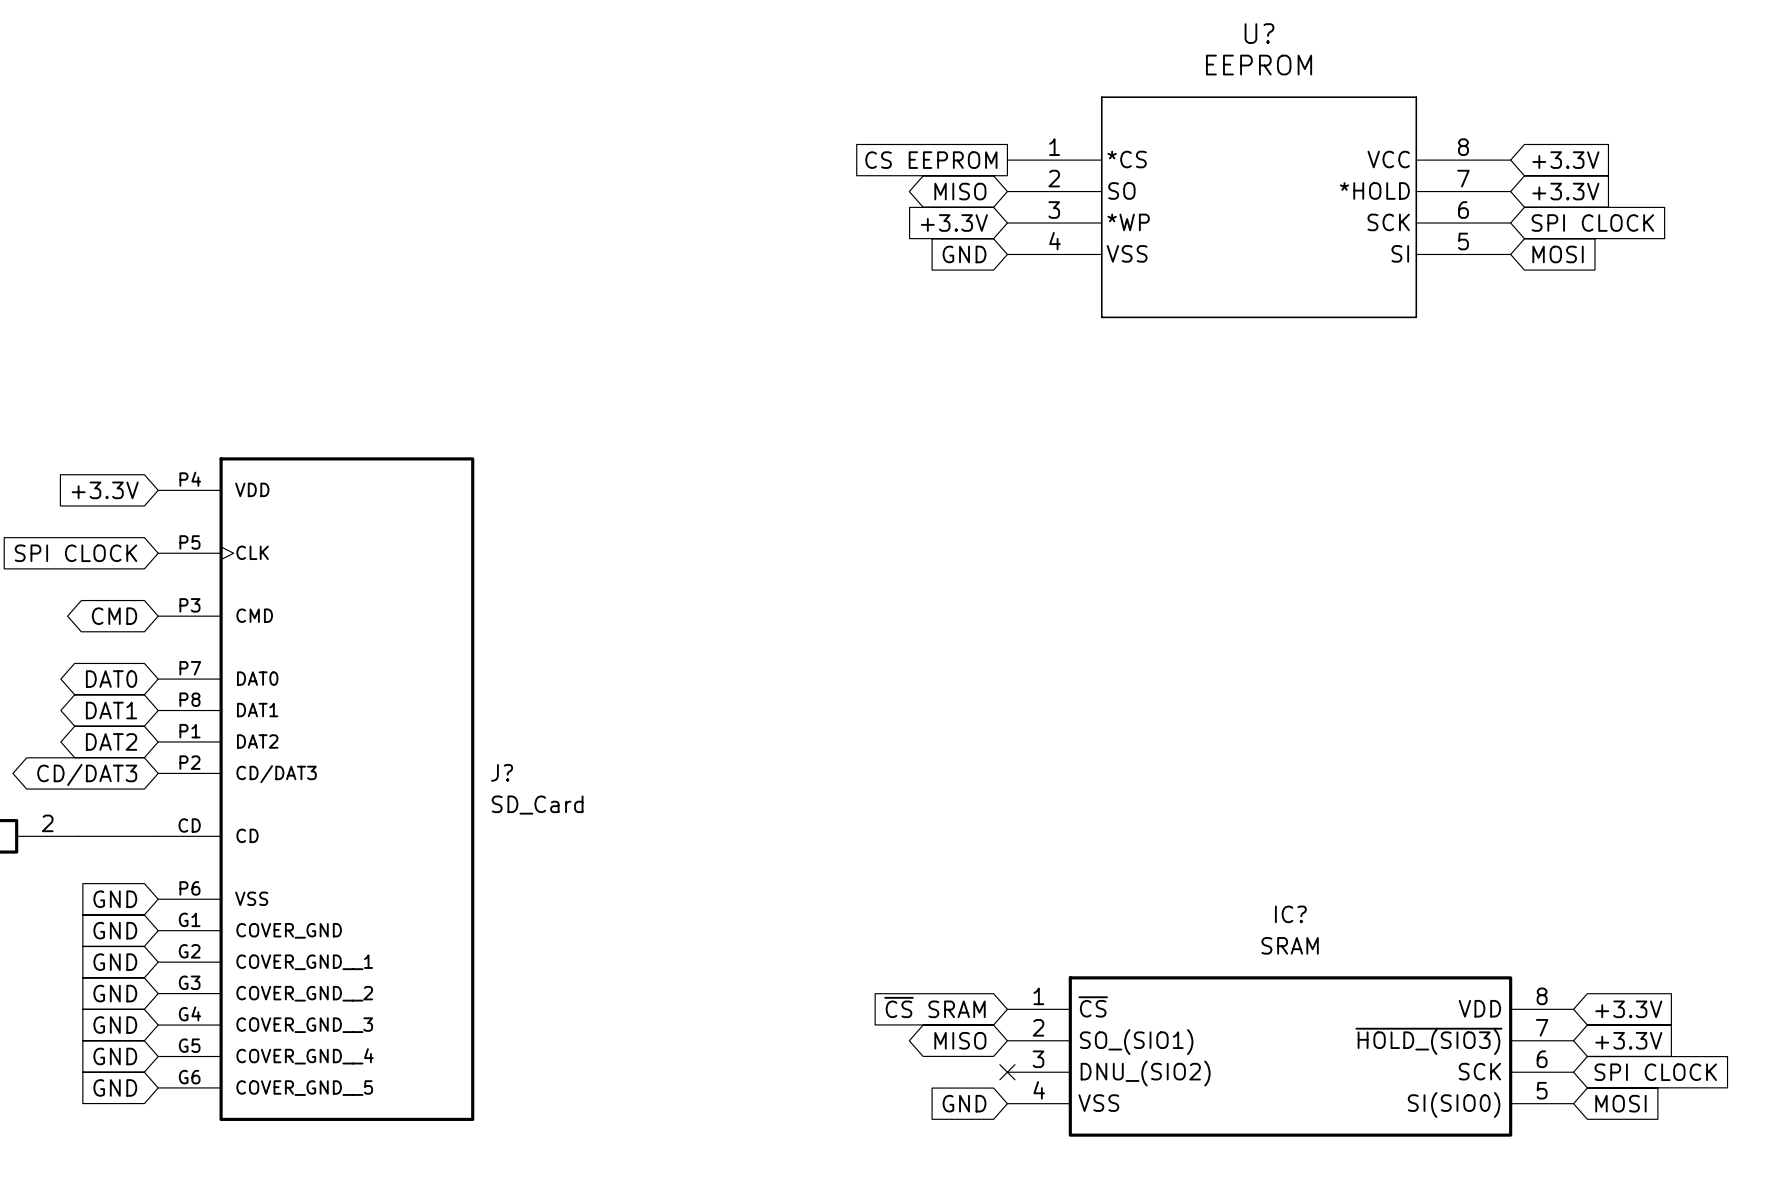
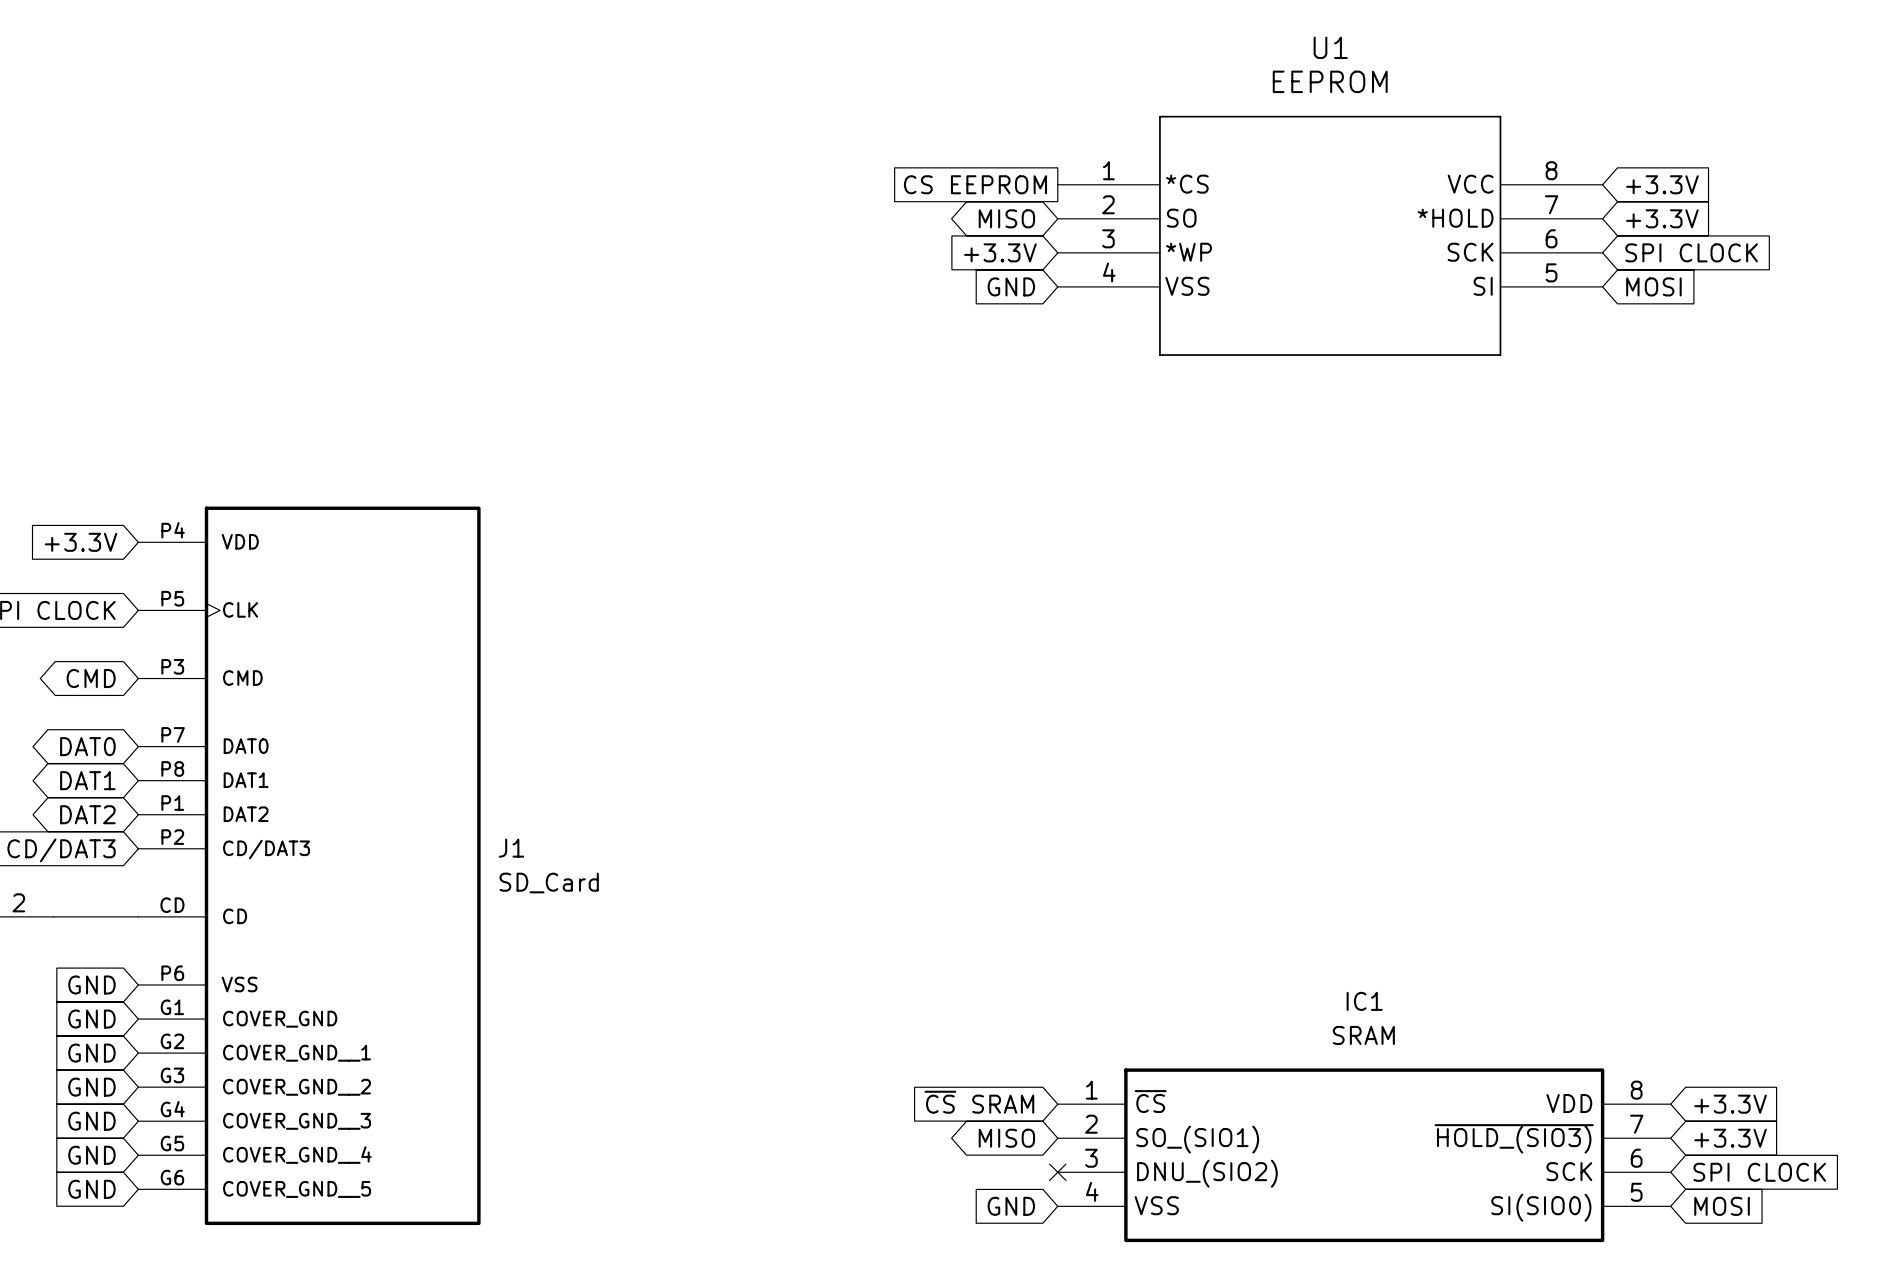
U? name: U? (1259, 33) -> U1 (1330, 47)
J? name: J? (502, 772) -> J1 (511, 848)
IC? name: IC? (1290, 914) -> IC1 (1364, 1001)

